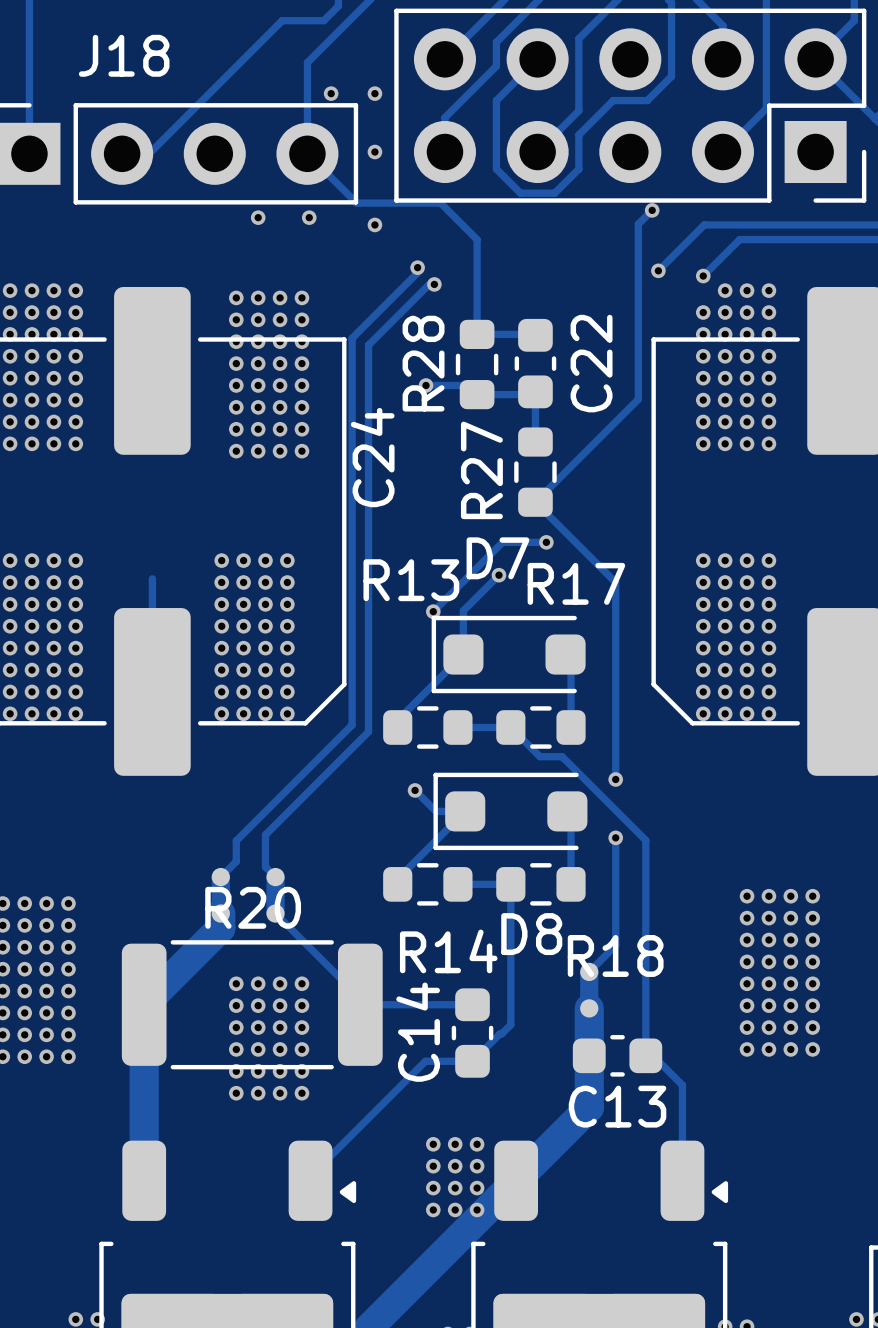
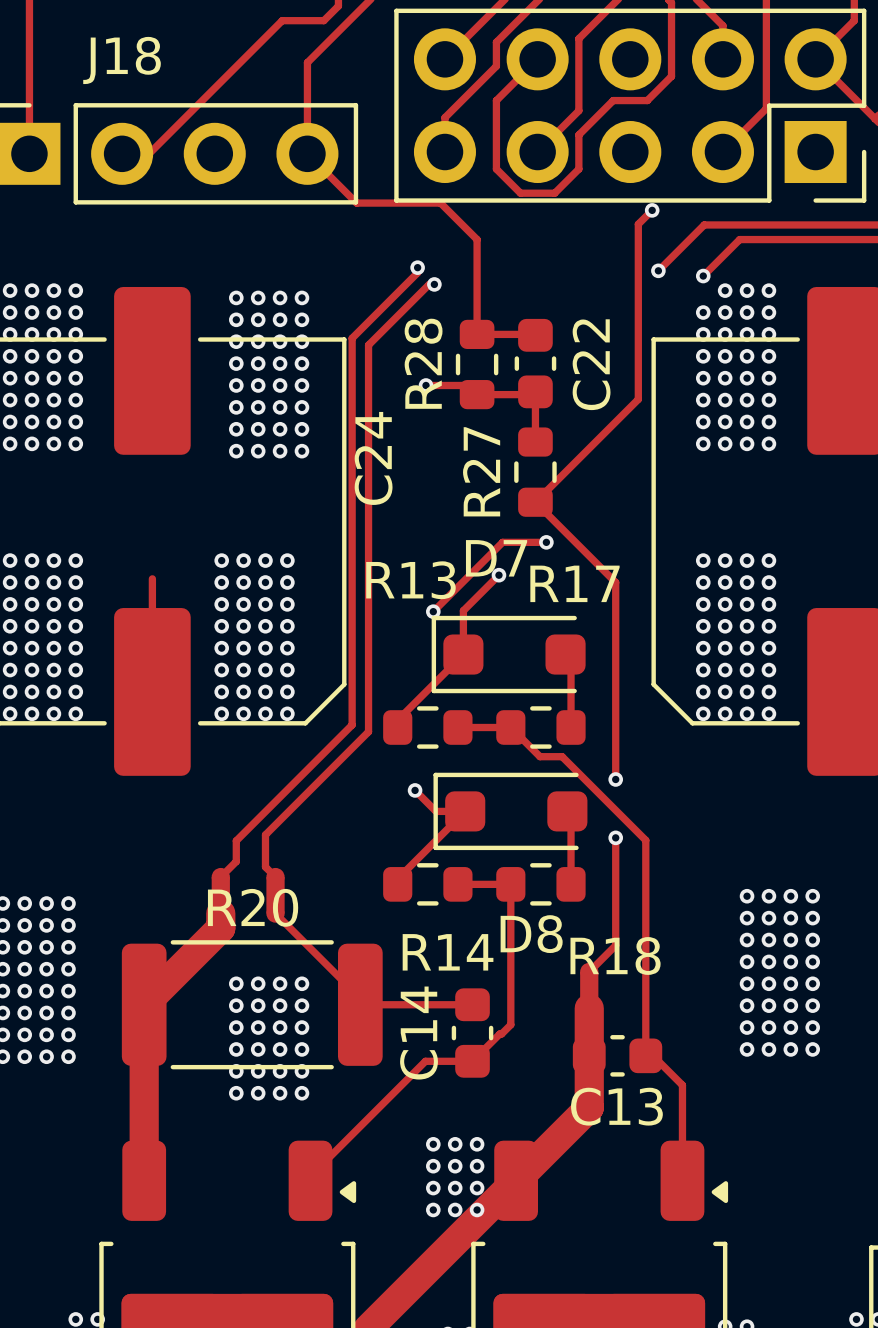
via: (331, 93) -> none
via: (374, 93) -> none
via: (374, 152) -> none
via: (258, 217) -> none
via: (309, 217) -> none
via: (374, 224) -> none

